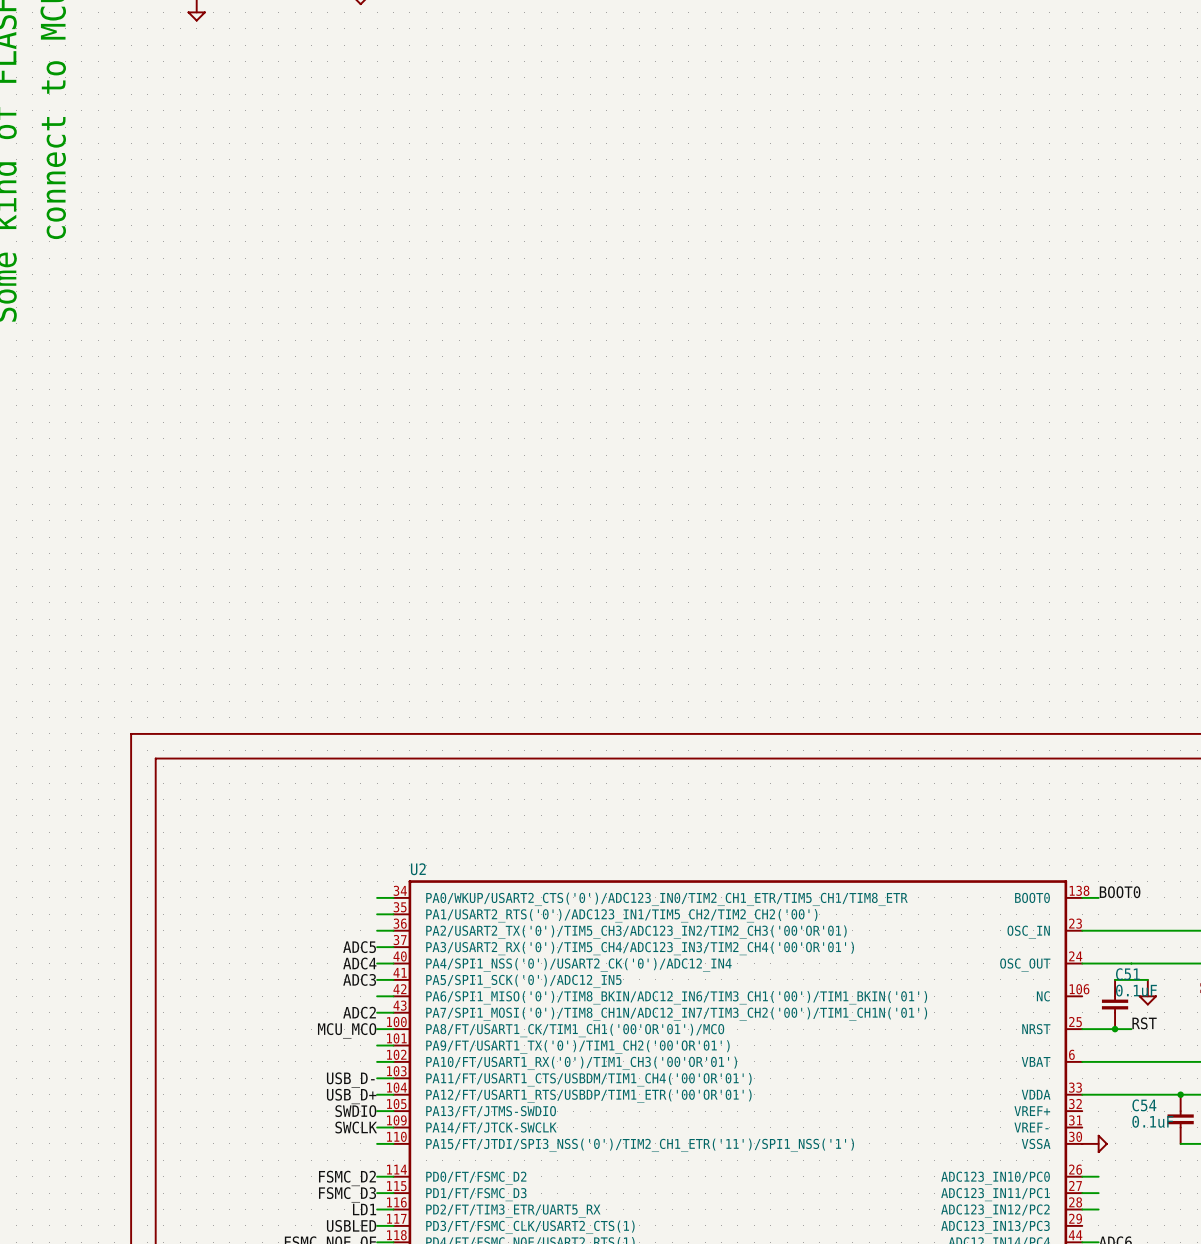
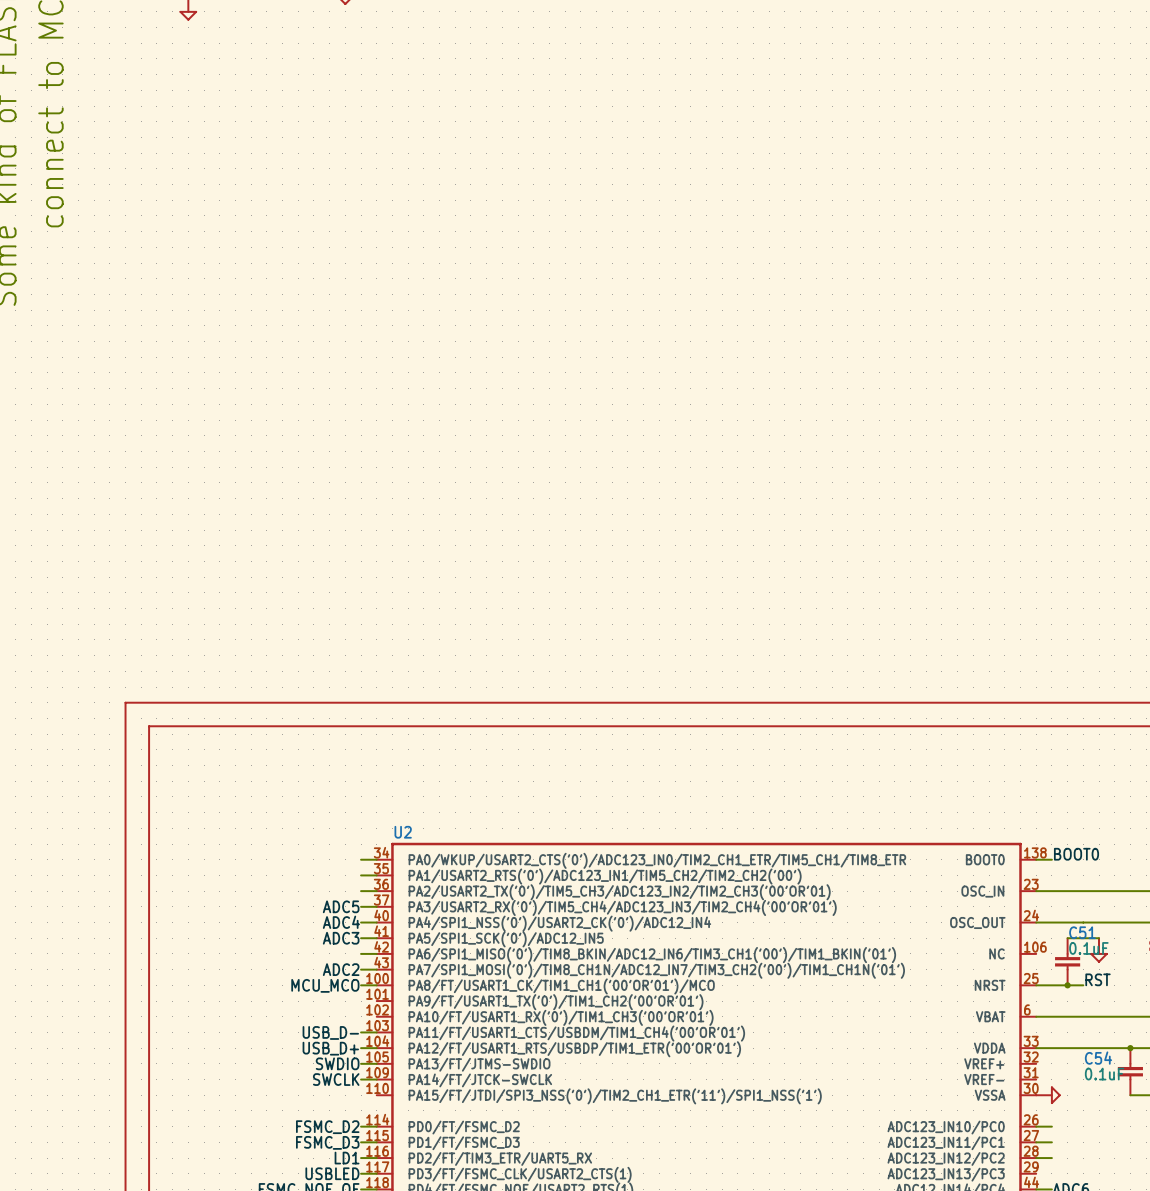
wire: (377, 1045) (393, 1045) -> none
wire: (377, 1061) (393, 1061) -> none
wire: (377, 1143) (393, 1143) -> none

